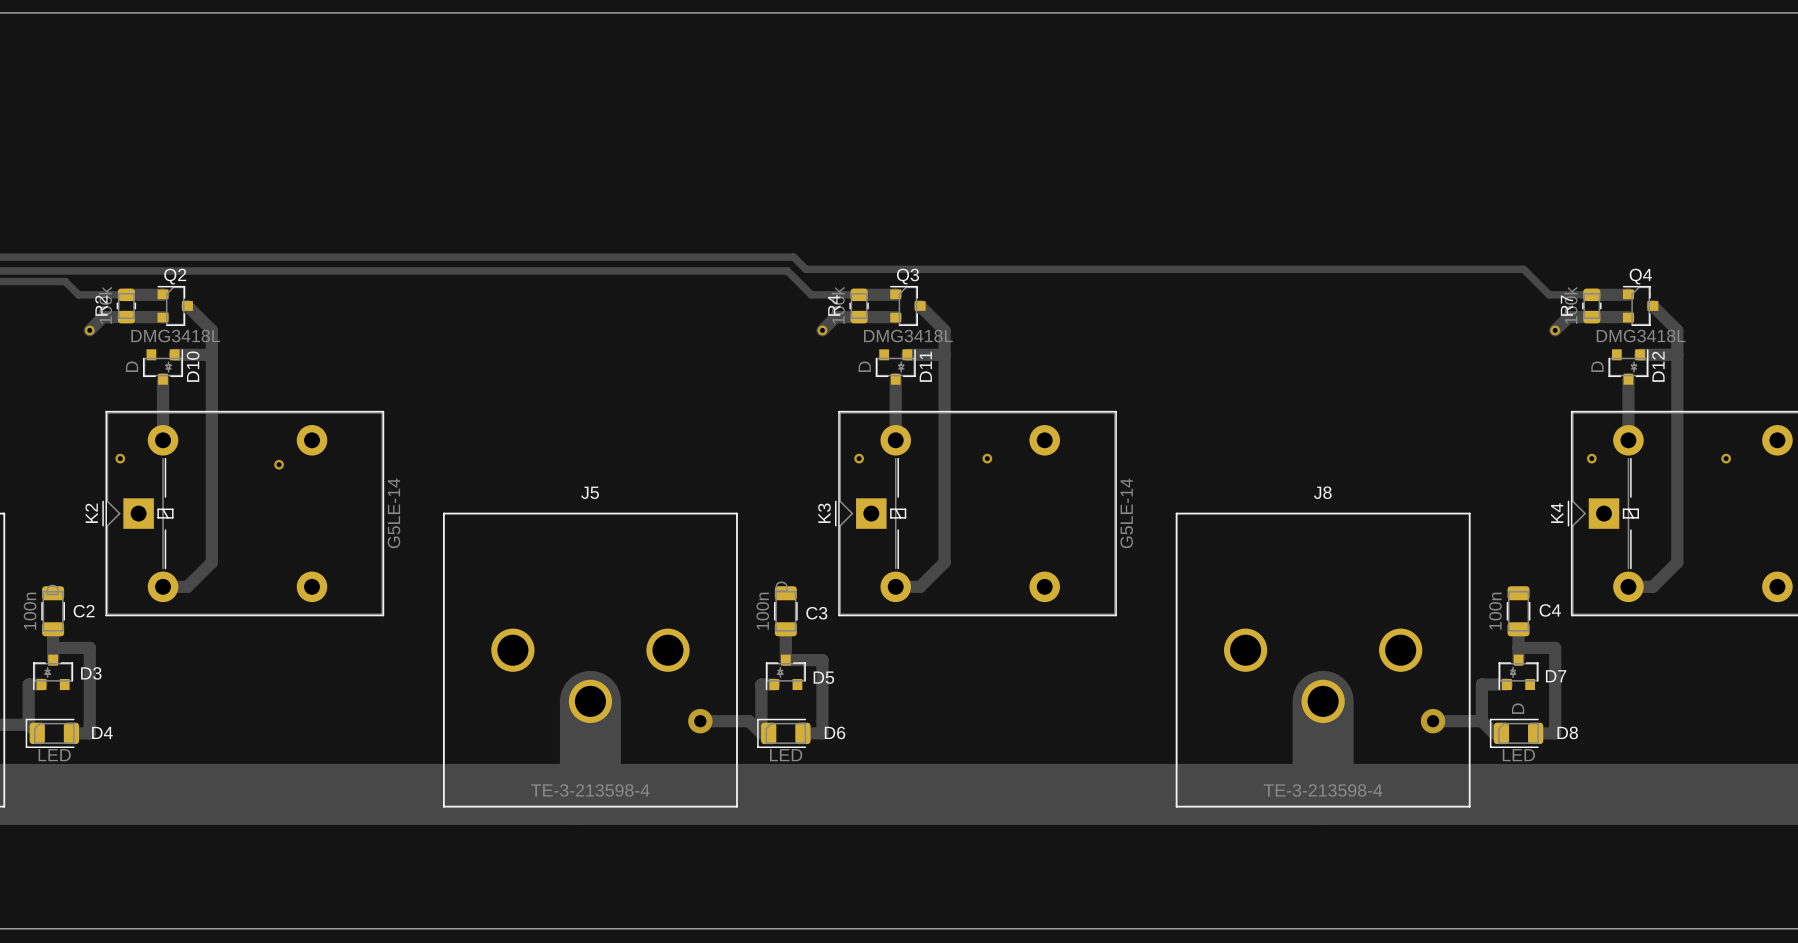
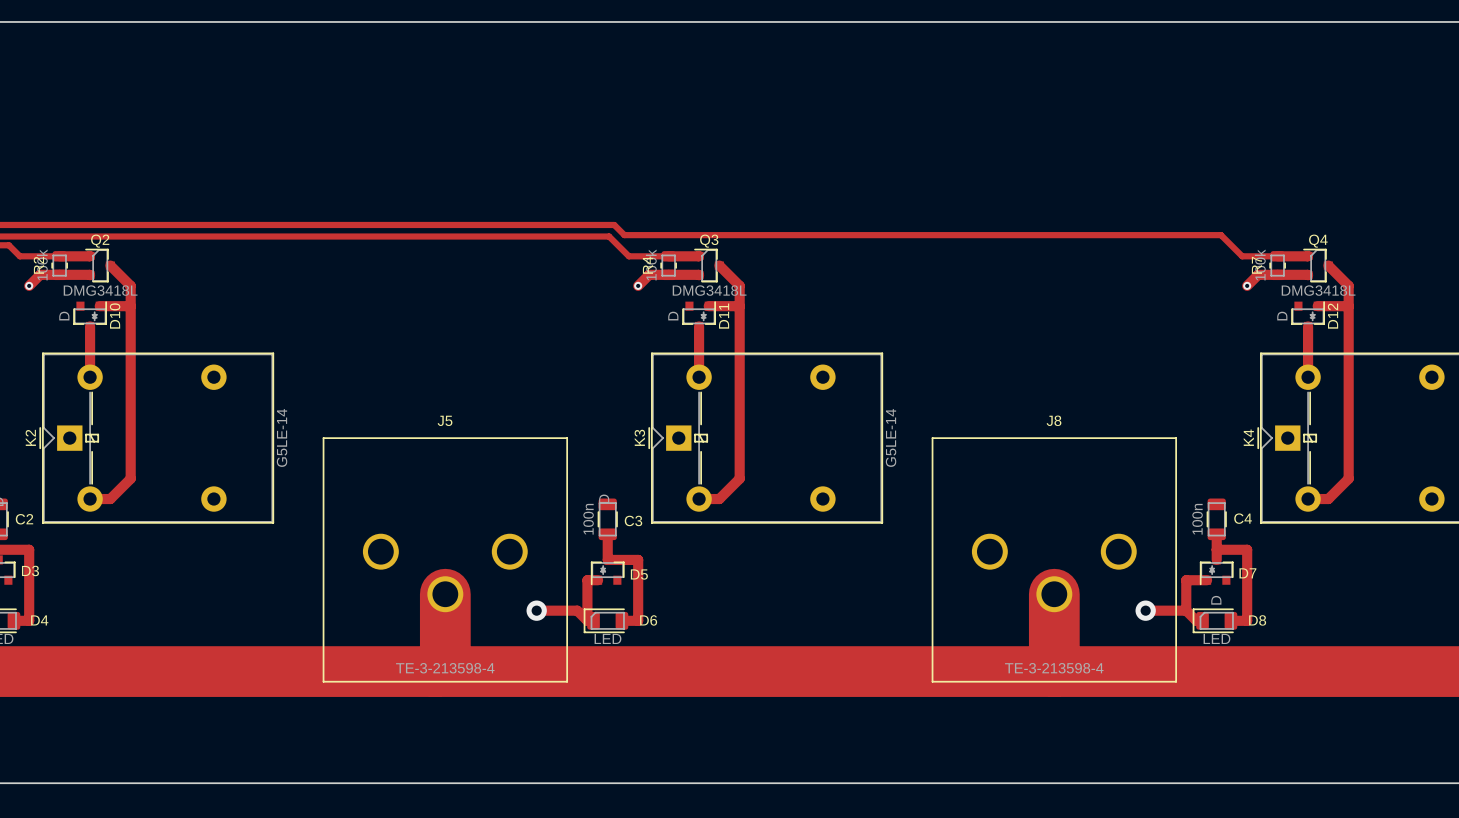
via: (120, 458) -> none
via: (859, 458) -> none
via: (987, 458) -> none
via: (1591, 458) -> none
via: (1726, 458) -> none
via: (279, 464) -> none

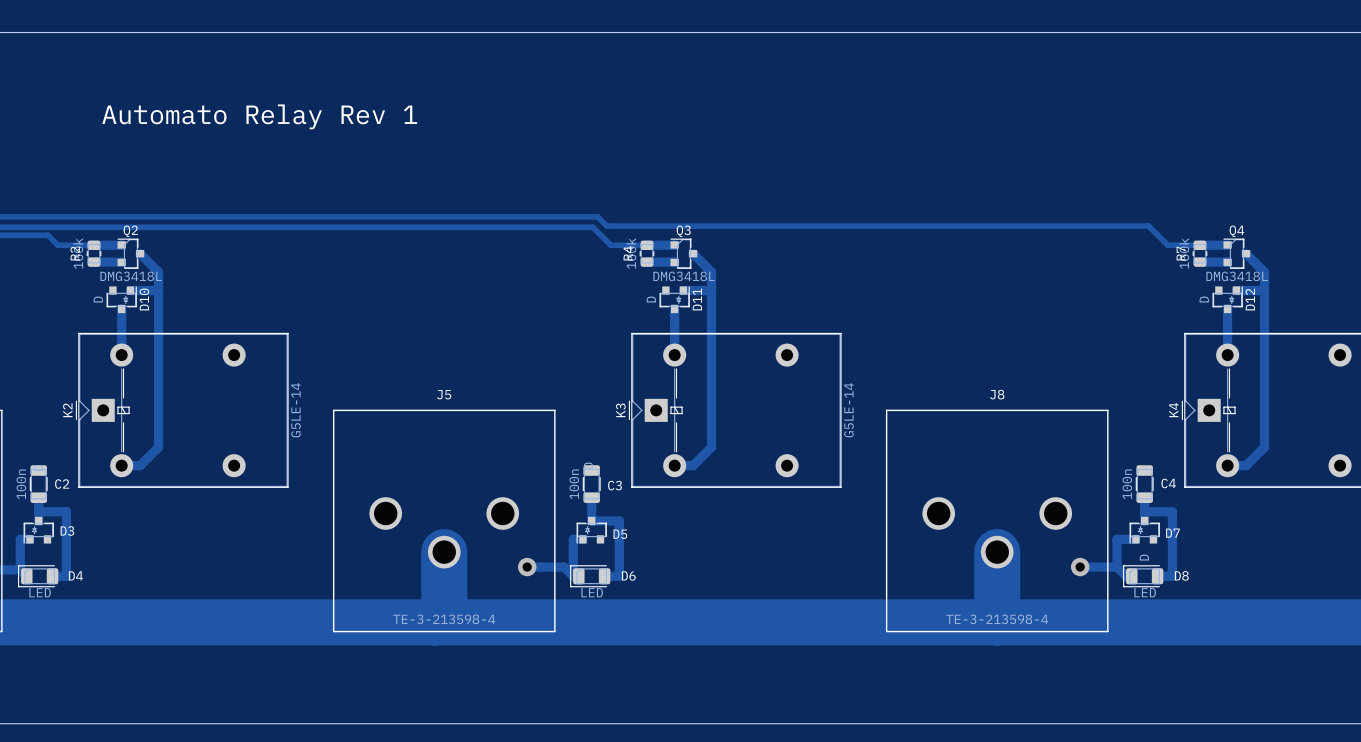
text: none -> Automato Relay Rev 1 (259, 116)
track: (59, 274) (40, 274) (29, 285) -> none
track: (668, 274) (649, 274) (638, 285) -> none
track: (1277, 274) (1258, 274) (1247, 285) -> none
via: (29, 285) -> none
via: (638, 285) -> none
via: (1247, 285) -> none

